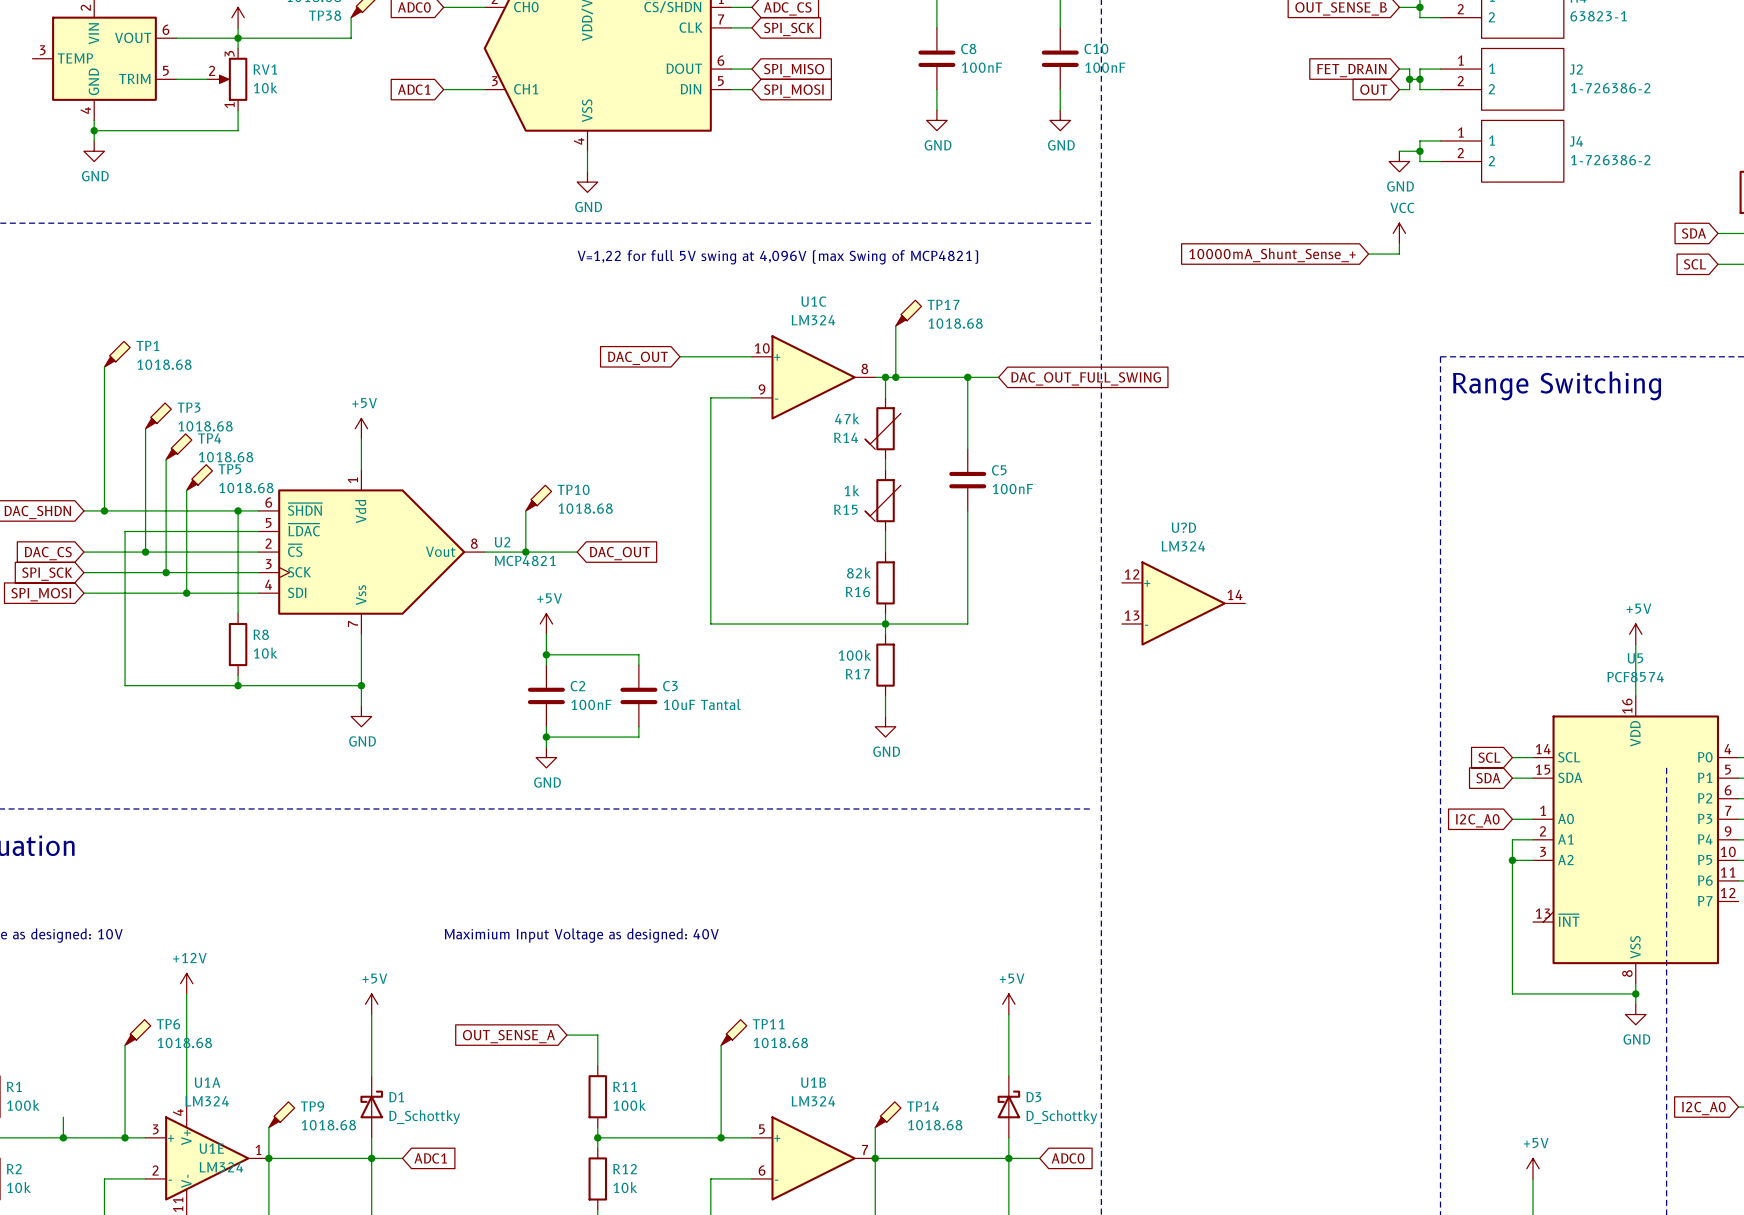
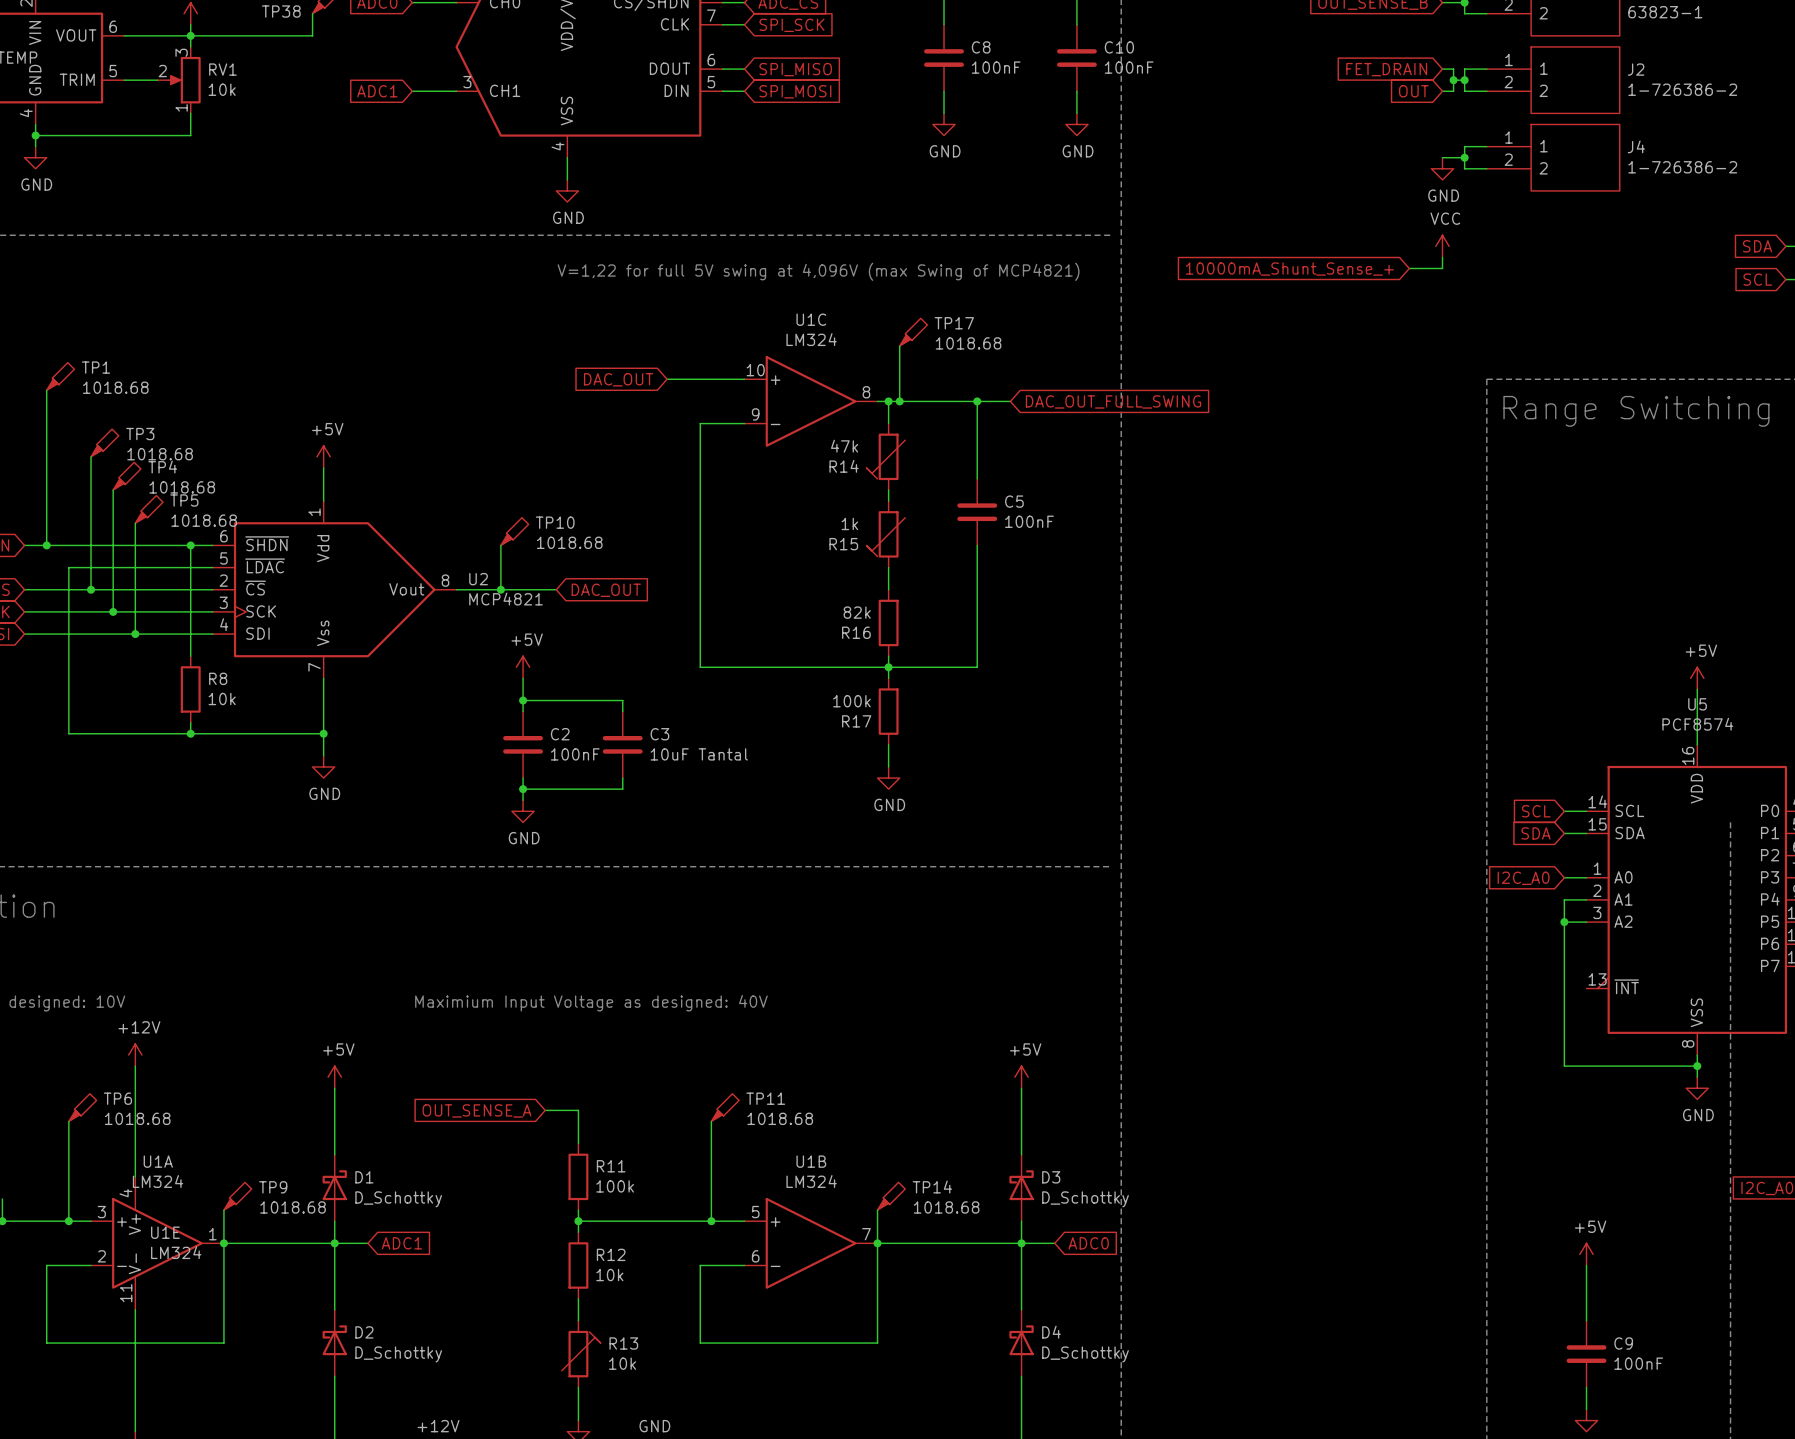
U?D: LM324 (1183, 603) -> none

